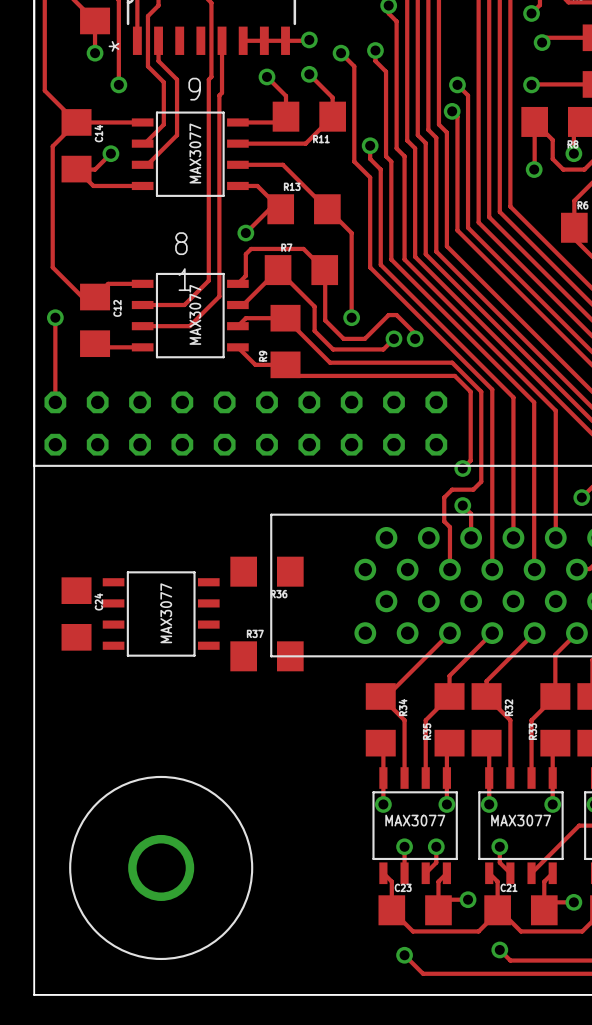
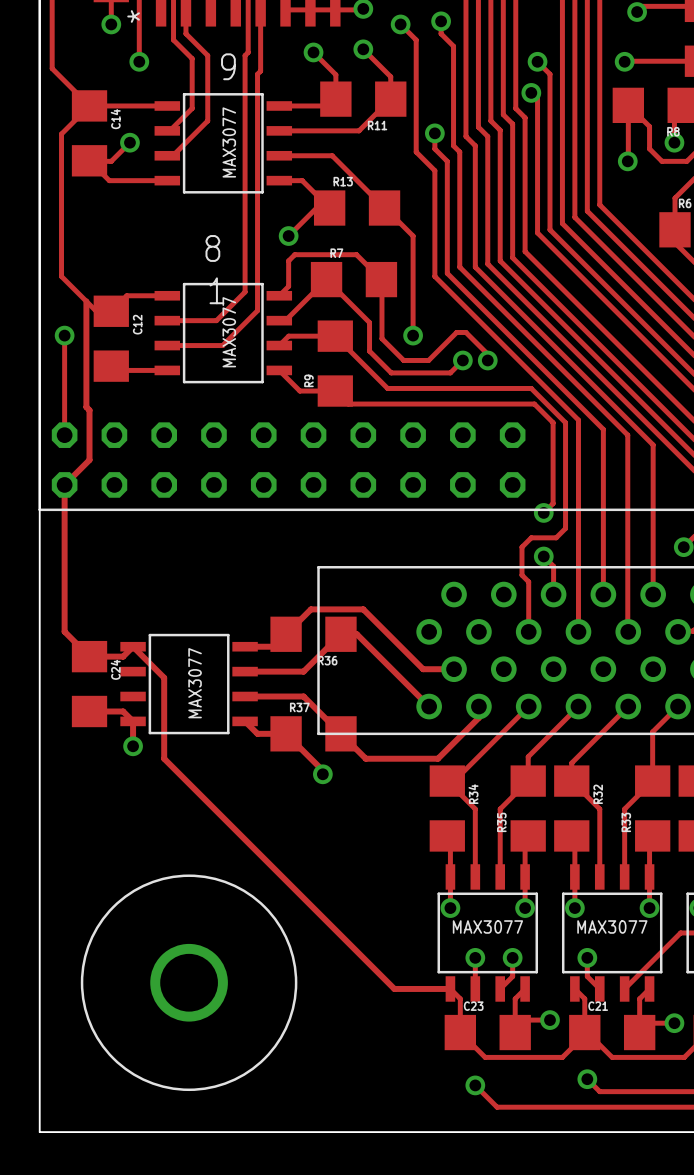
track: none -> (86, 301) (86, 407) (89, 410) (89, 460) (64, 484) (64, 631) (89, 656) (123, 656) (133, 646) (164, 677) (164, 758) (394, 988) (450, 988)
track: none -> (245, 646) (273, 646) (310, 609) (363, 609) (423, 669) (454, 669)
track: none -> (245, 671) (303, 671) (340, 634) (356, 634) (429, 706)
track: none -> (245, 696) (303, 696) (365, 758) (437, 758) (478, 717) (478, 706)
track: none -> (89, 711) (123, 711) (133, 721) (133, 746)
track: none -> (245, 721) (257, 733) (286, 733) (322, 770) (322, 774)
via: none -> (133, 746)
via: none -> (322, 774)

